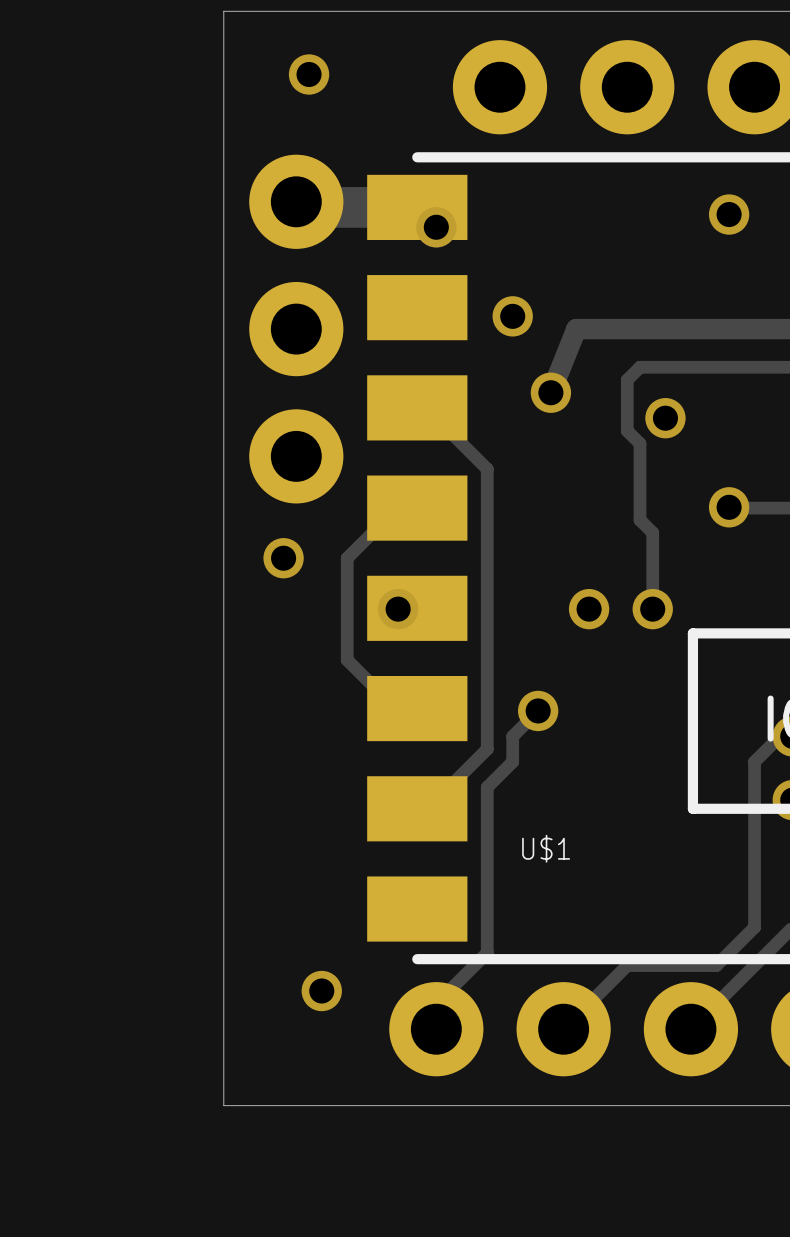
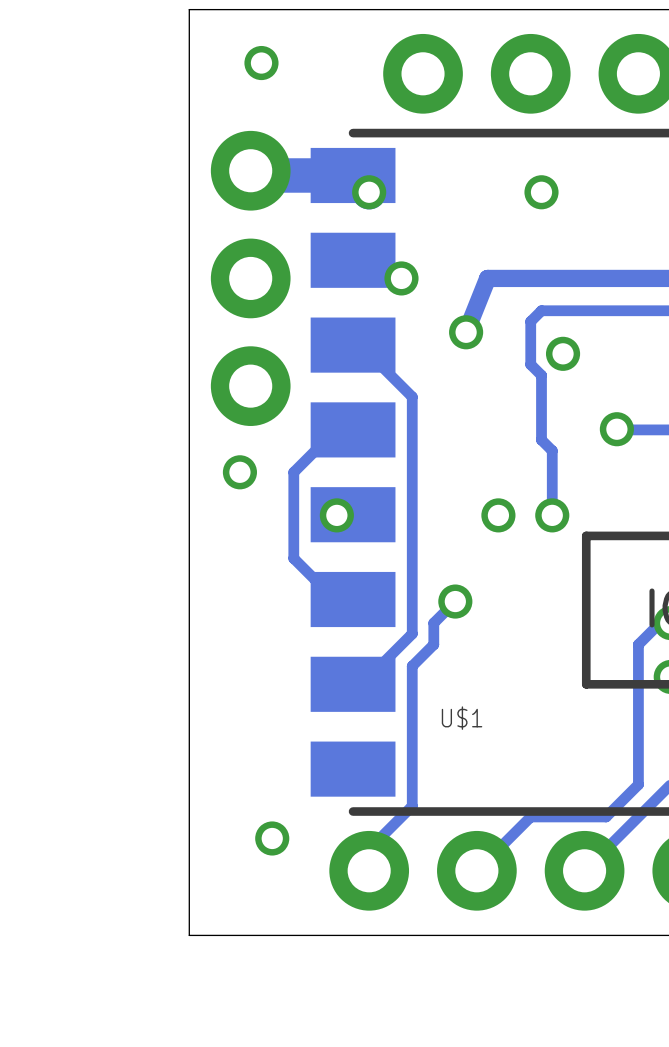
via: (729, 214) -> none
via: none -> (541, 192)
via position: (512, 316) -> (401, 278)

